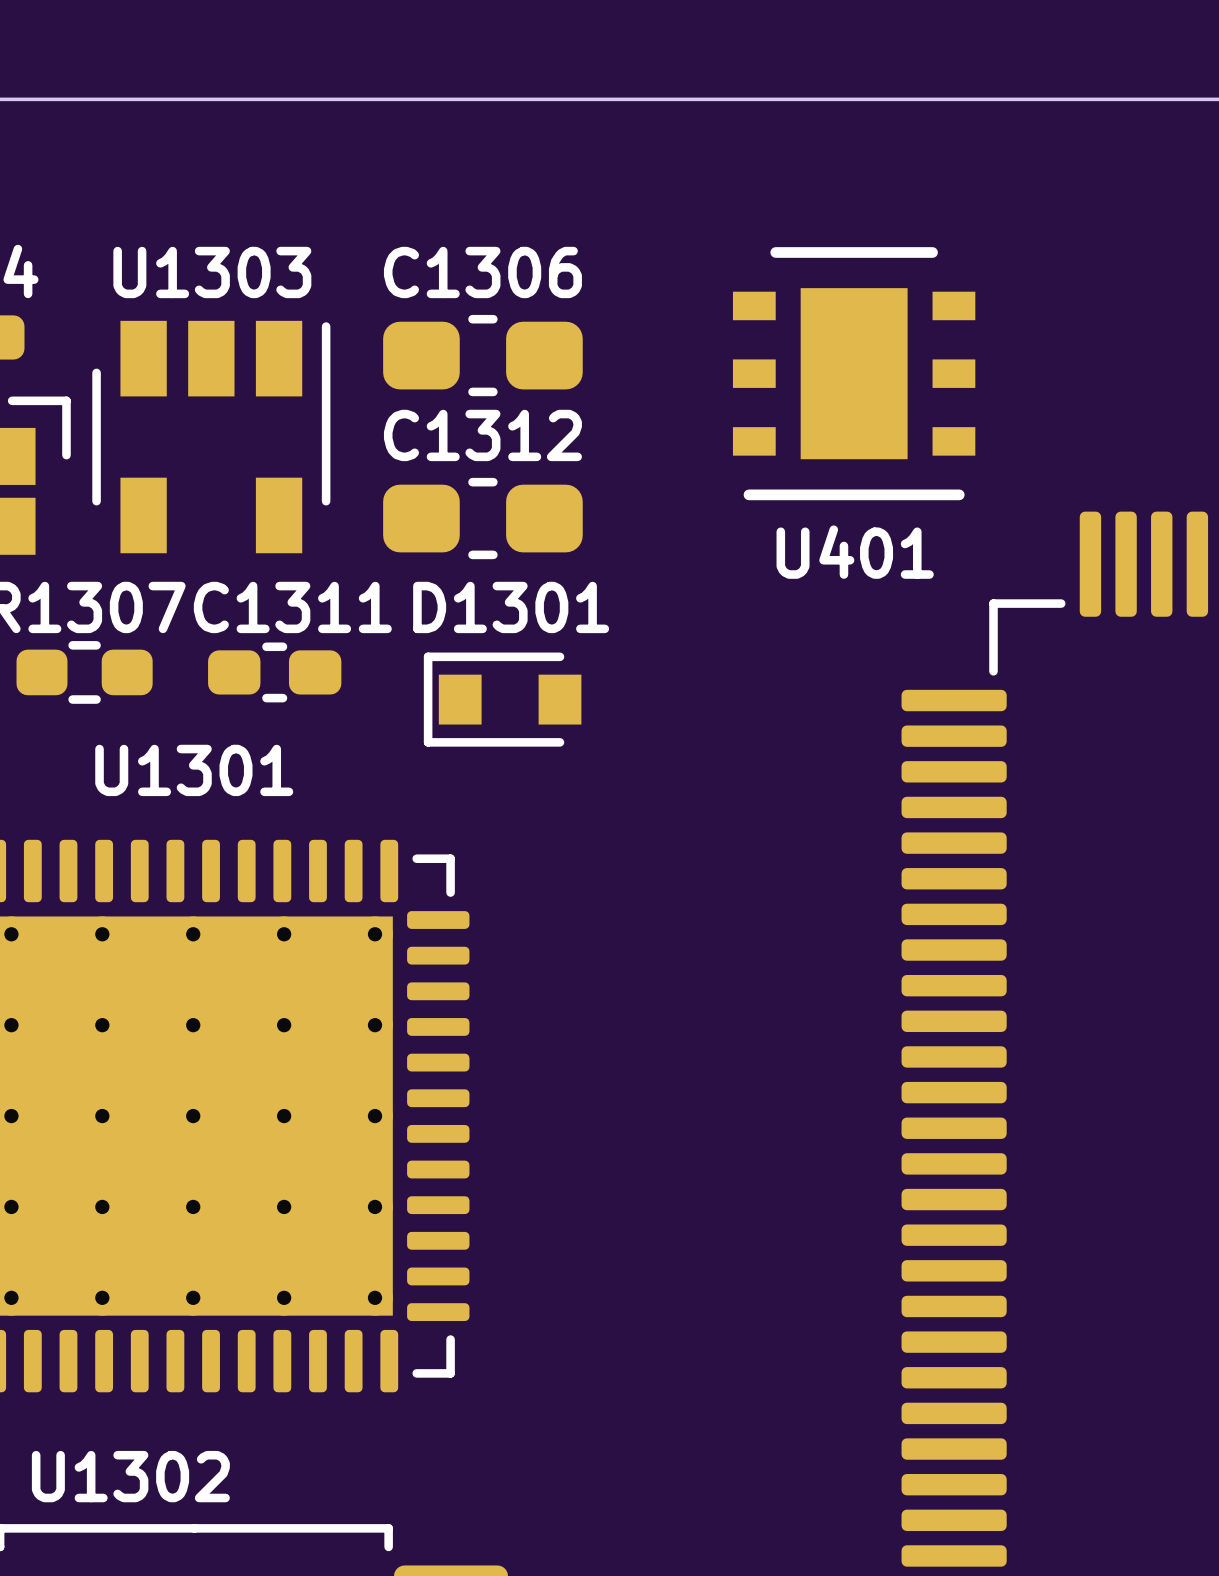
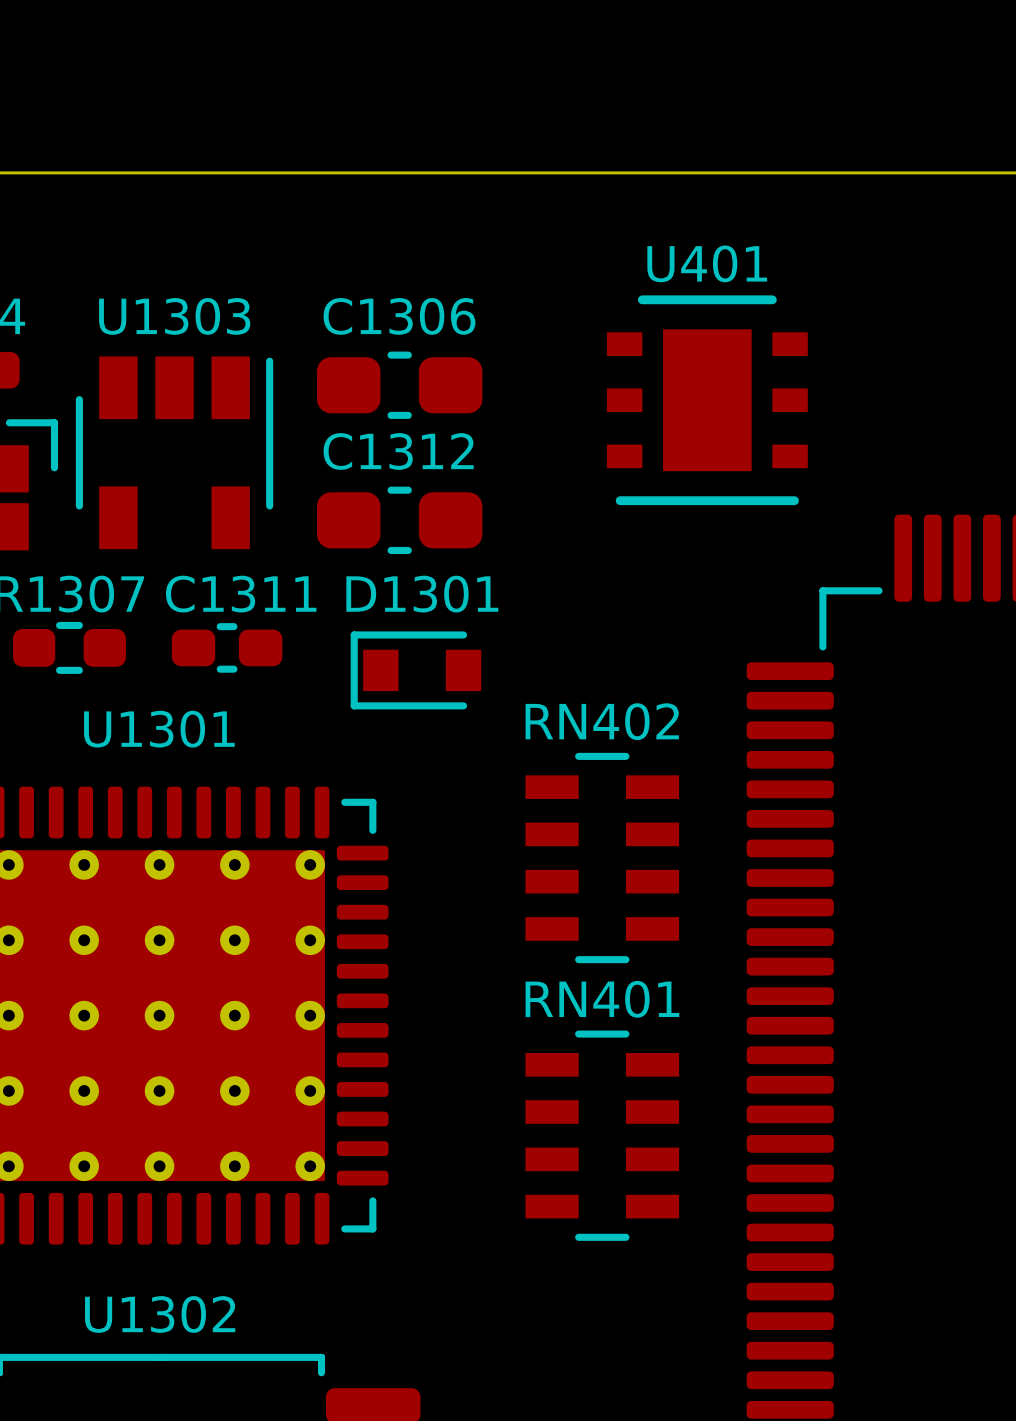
U401 name position: U401 (855, 552) -> U401 (707, 263)
RN402: none -> (602, 858)
RN401: none -> (602, 1135)
U1302 name position: U1302 (130, 1476) -> U1302 (160, 1314)

